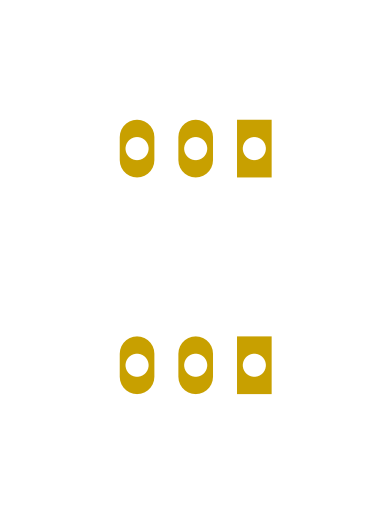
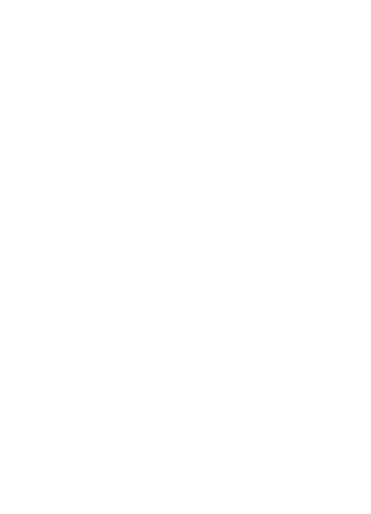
part: (195, 148) -> none
part: (195, 365) -> none

